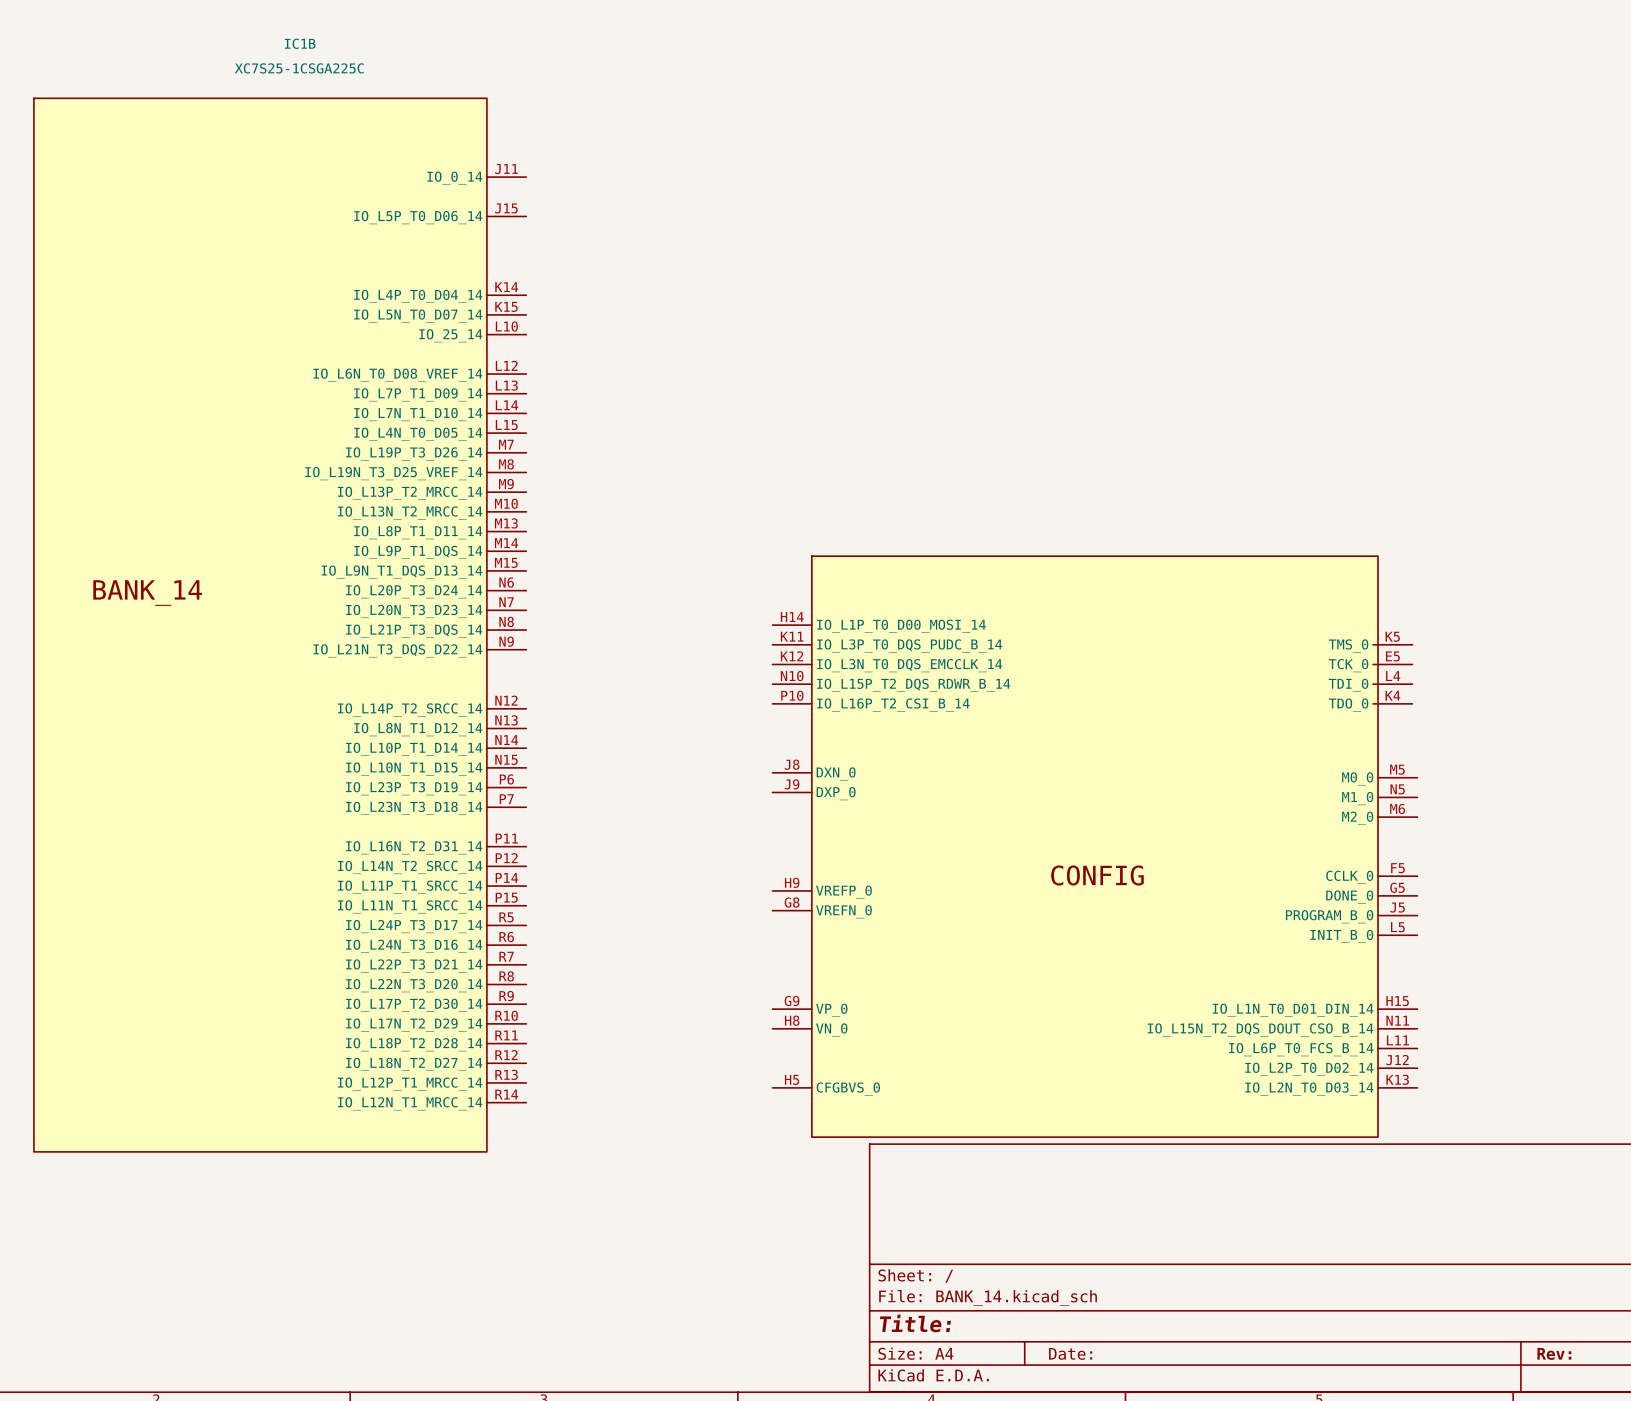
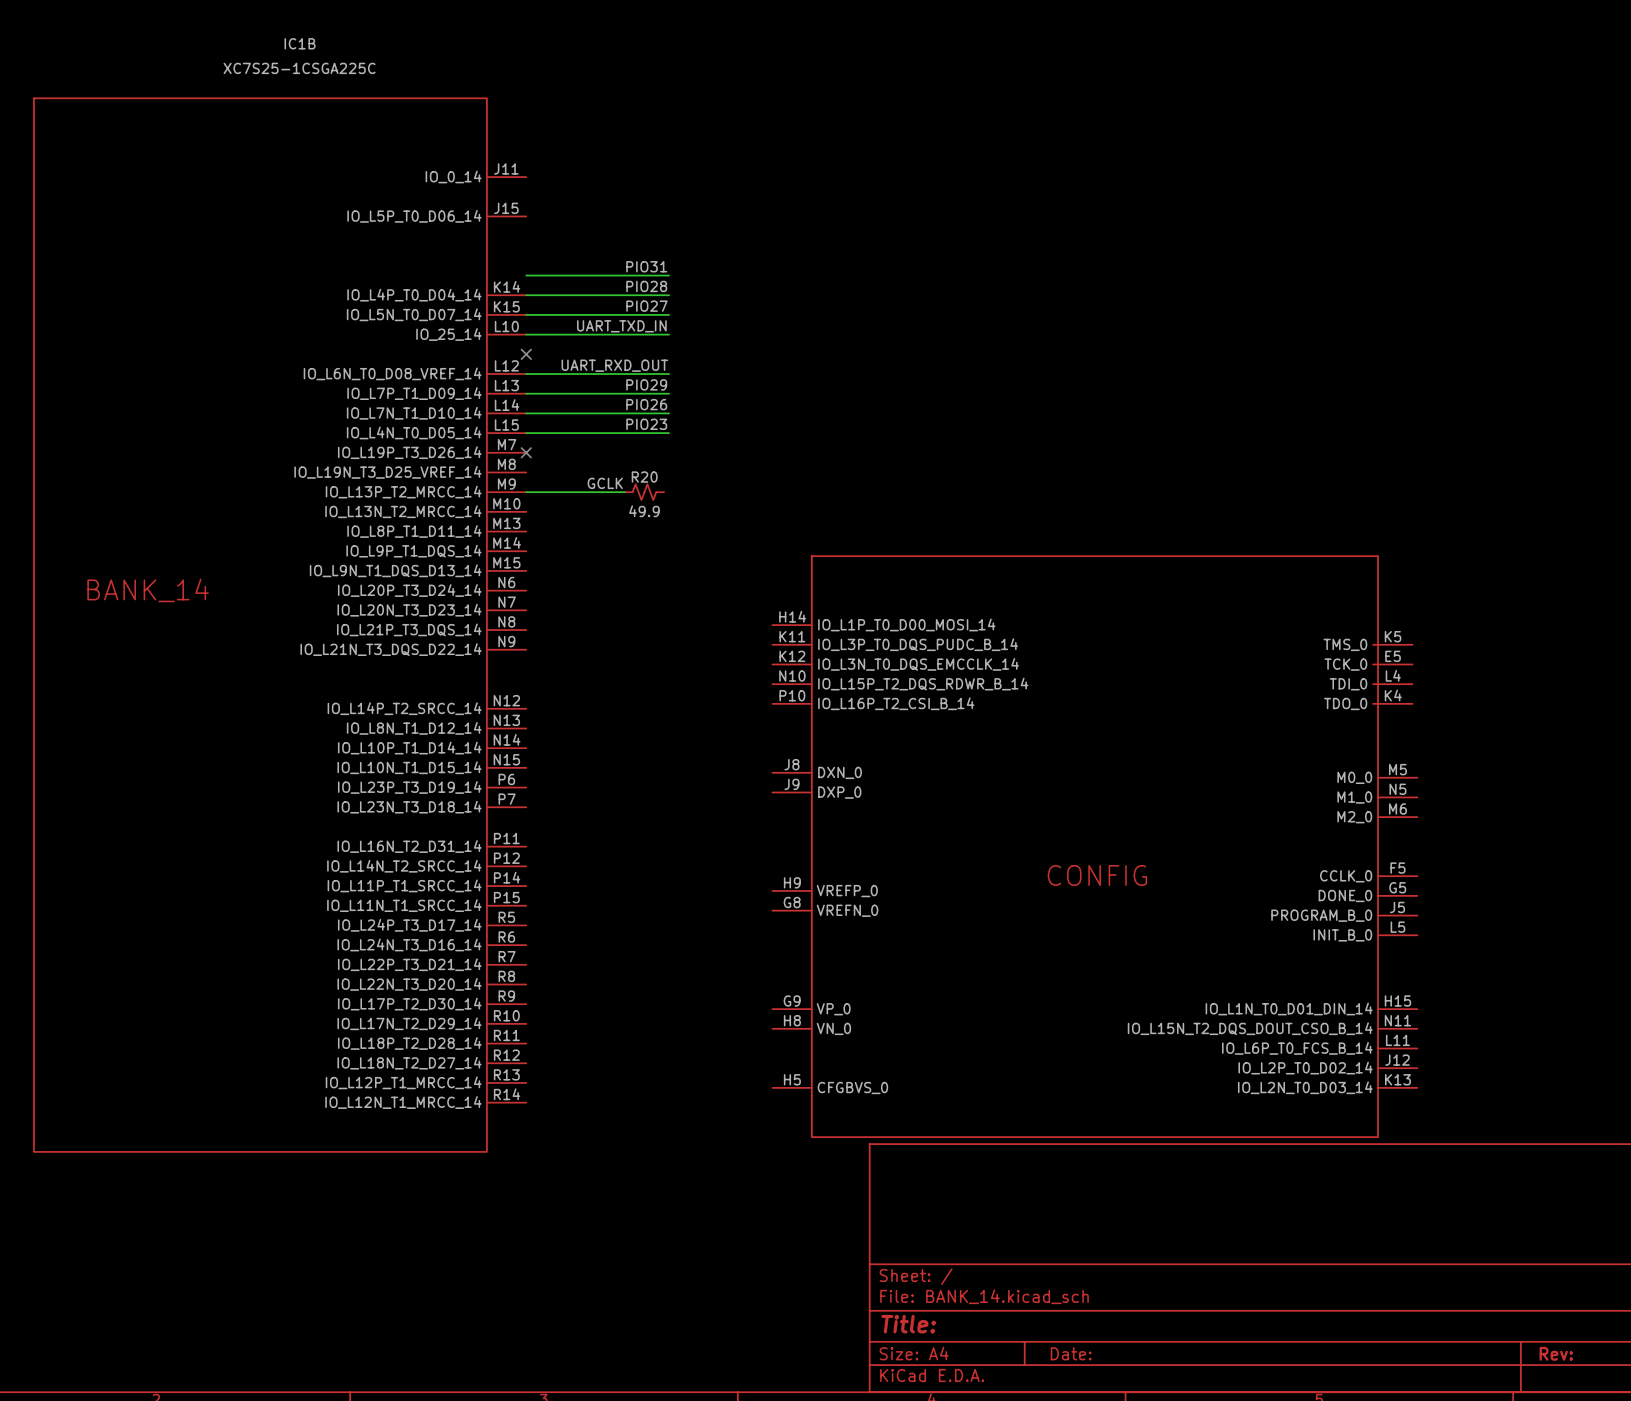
label: none -> PIO31 (646, 266)
wire: none -> (526, 275) (669, 275)
label: none -> PIO28 (646, 286)
wire: none -> (526, 295) (669, 295)
label: none -> PIO27 (646, 306)
wire: none -> (526, 314) (669, 314)
label: none -> UART_TXD_IN (621, 326)
wire: none -> (526, 334) (669, 334)
no-connect mark: none -> (526, 354)
label: none -> UART_RXD_OUT (614, 365)
wire: none -> (526, 374) (669, 374)
label: none -> PIO29 (646, 384)
wire: none -> (526, 393) (669, 393)
label: none -> PIO26 (646, 404)
wire: none -> (526, 413) (669, 413)
label: none -> PIO23 (646, 424)
wire: none -> (526, 433) (669, 433)
no-connect mark: none -> (526, 452)
label: none -> GCLK (605, 483)
wire: none -> (526, 492) (624, 492)
R20: none -> 49.9 (644, 492)

